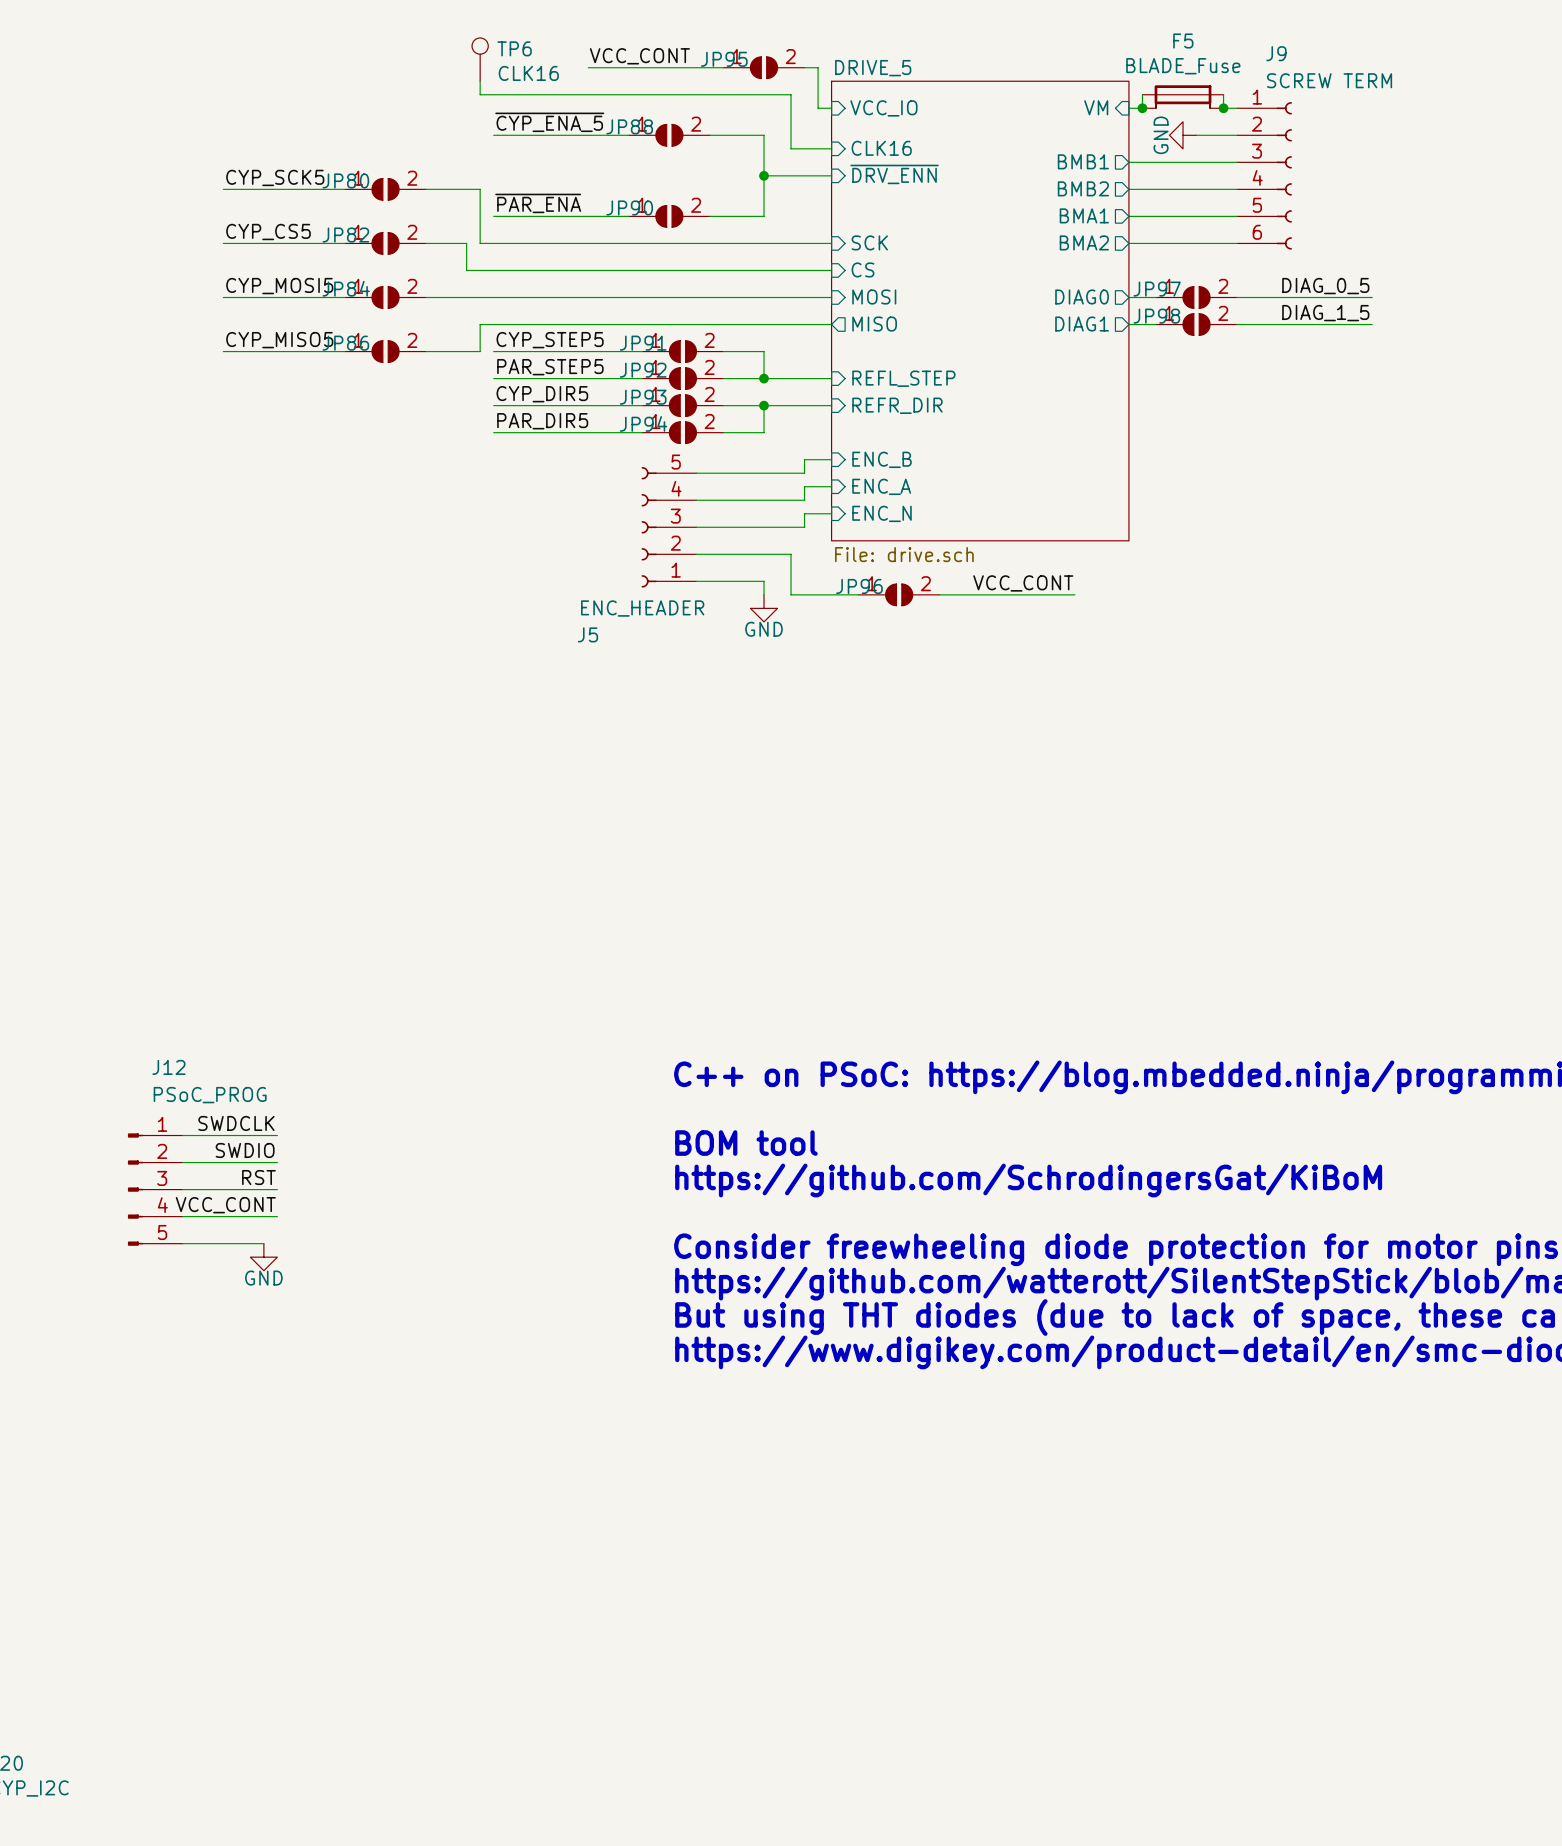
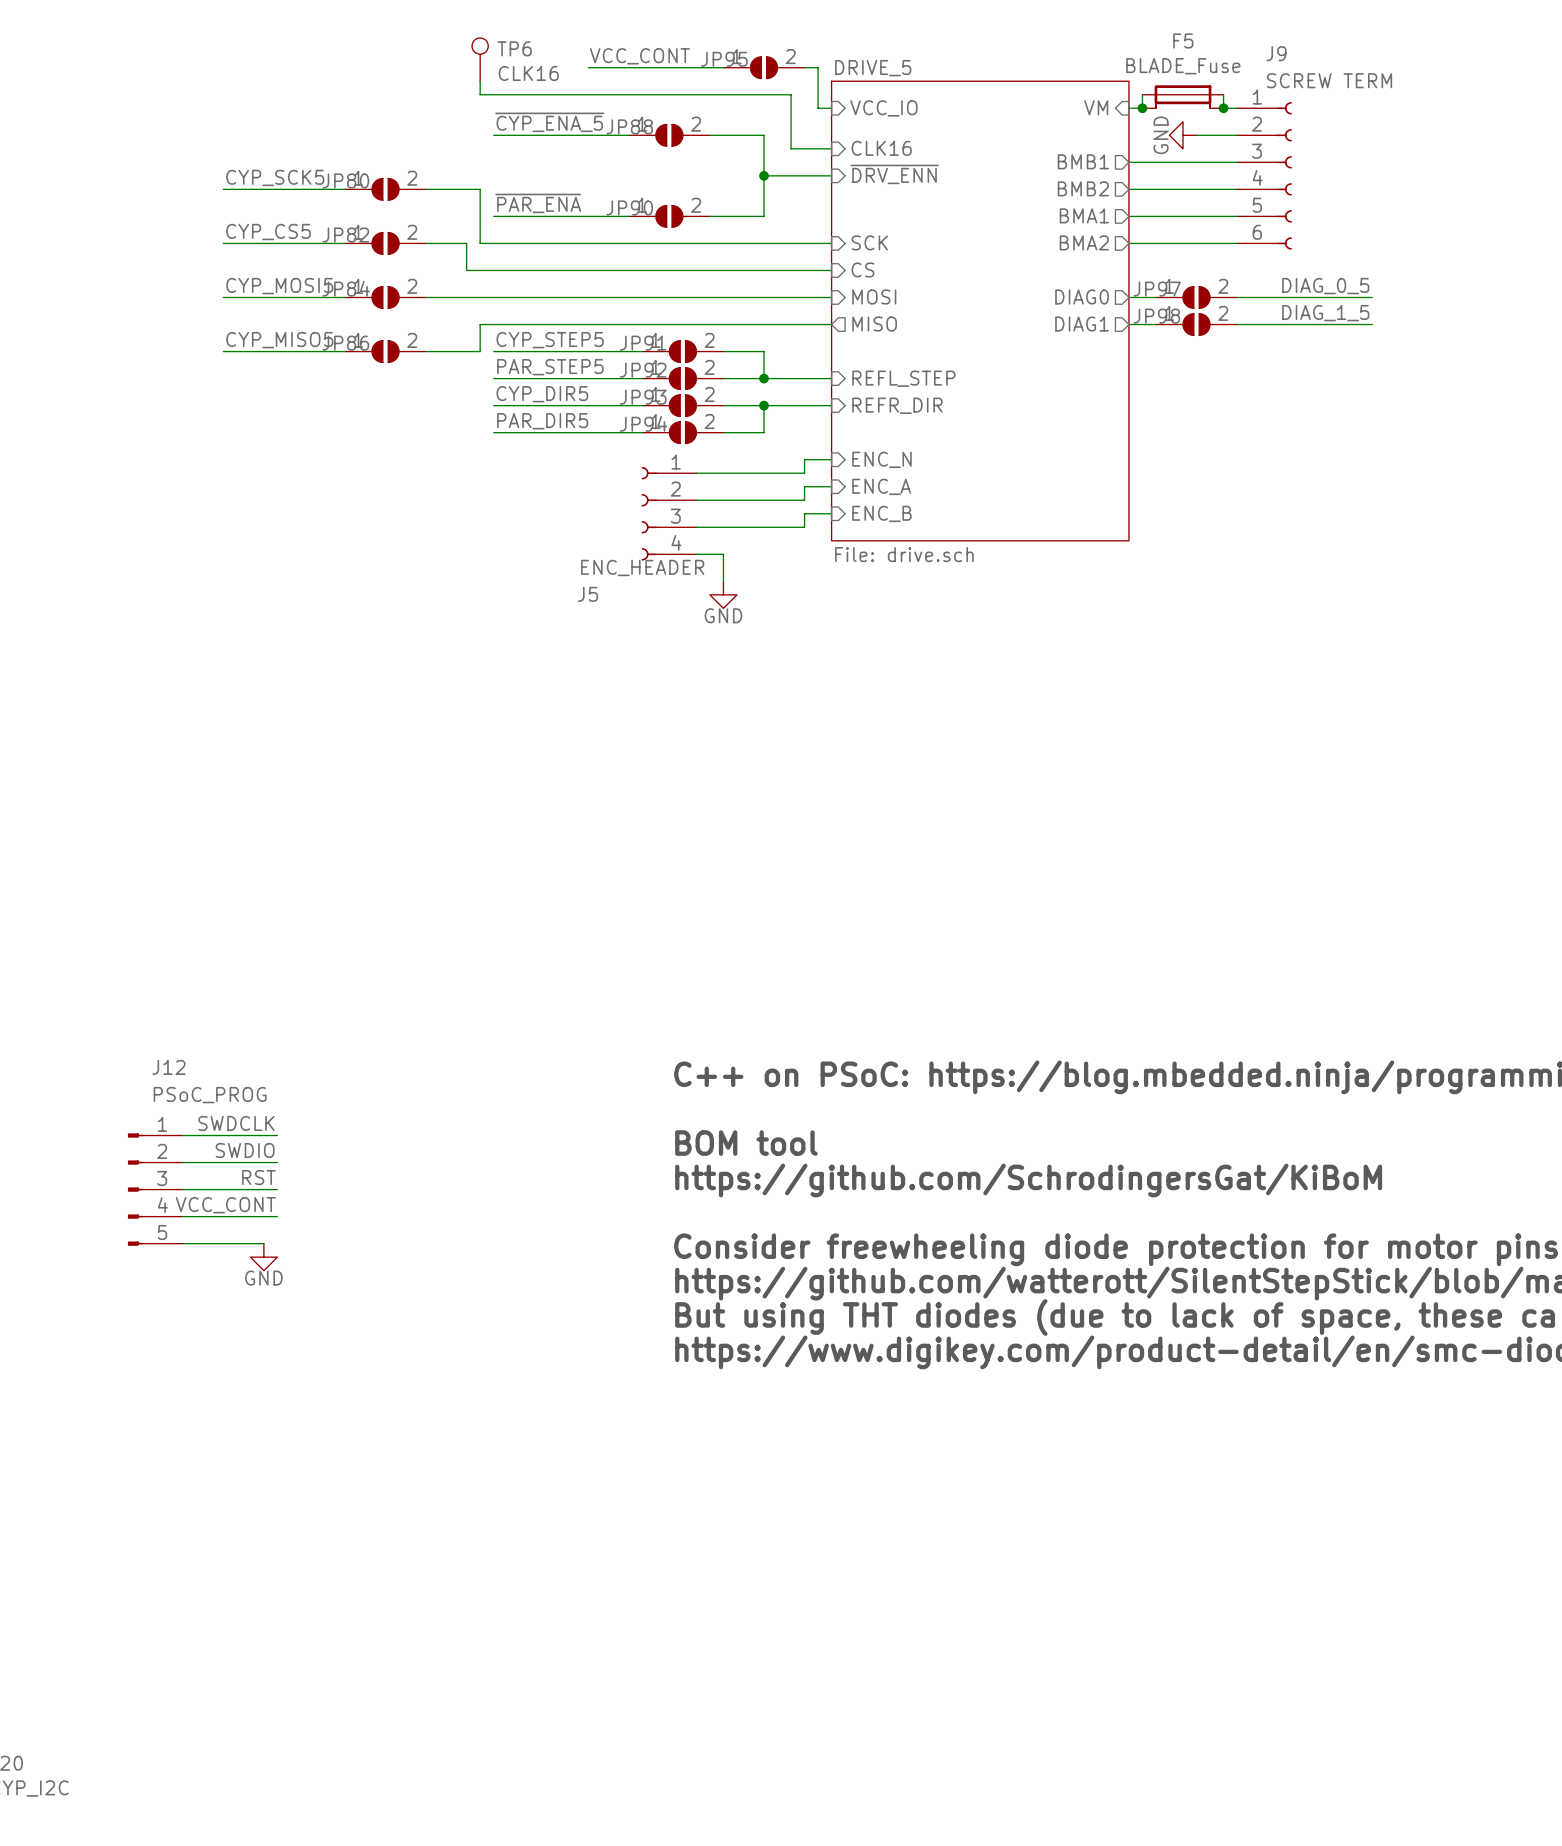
sheet pin: ENC_B (881, 459) -> ENC_N (881, 459)
J5 symbol: [641, 466, 697, 588] -> [641, 466, 697, 561]
sheet pin: ENC_N (881, 513) -> ENC_B (881, 513)
wire: (723, 554) (791, 554) (791, 594) (858, 594) -> (723, 554) (723, 581)
wire: (696, 581) (764, 581) (764, 594) -> none
label: VCC_CONT (1023, 583) -> none
JP96: (899, 594) -> none
wire: (939, 594) (1074, 594) -> none
J5 value position: ENC_HEADER (642, 608) -> ENC_HEADER (642, 567)
power symbol position: GND (764, 608) -> GND (723, 594)
J5 name position: J5 (587, 634) -> J5 (587, 594)

